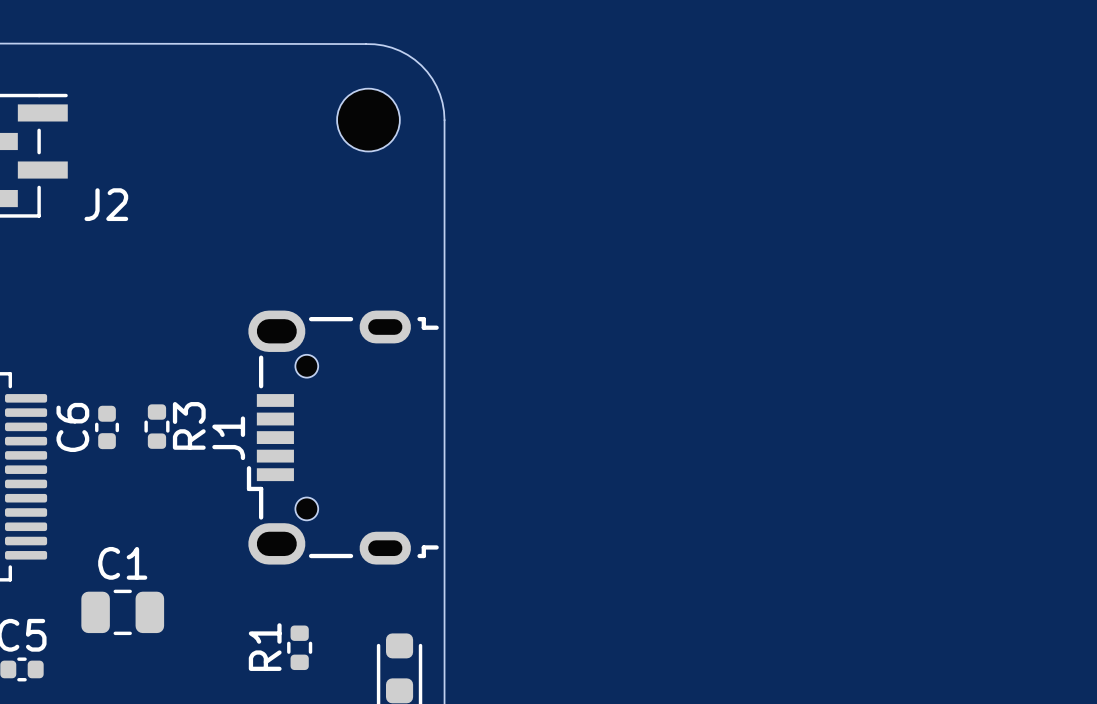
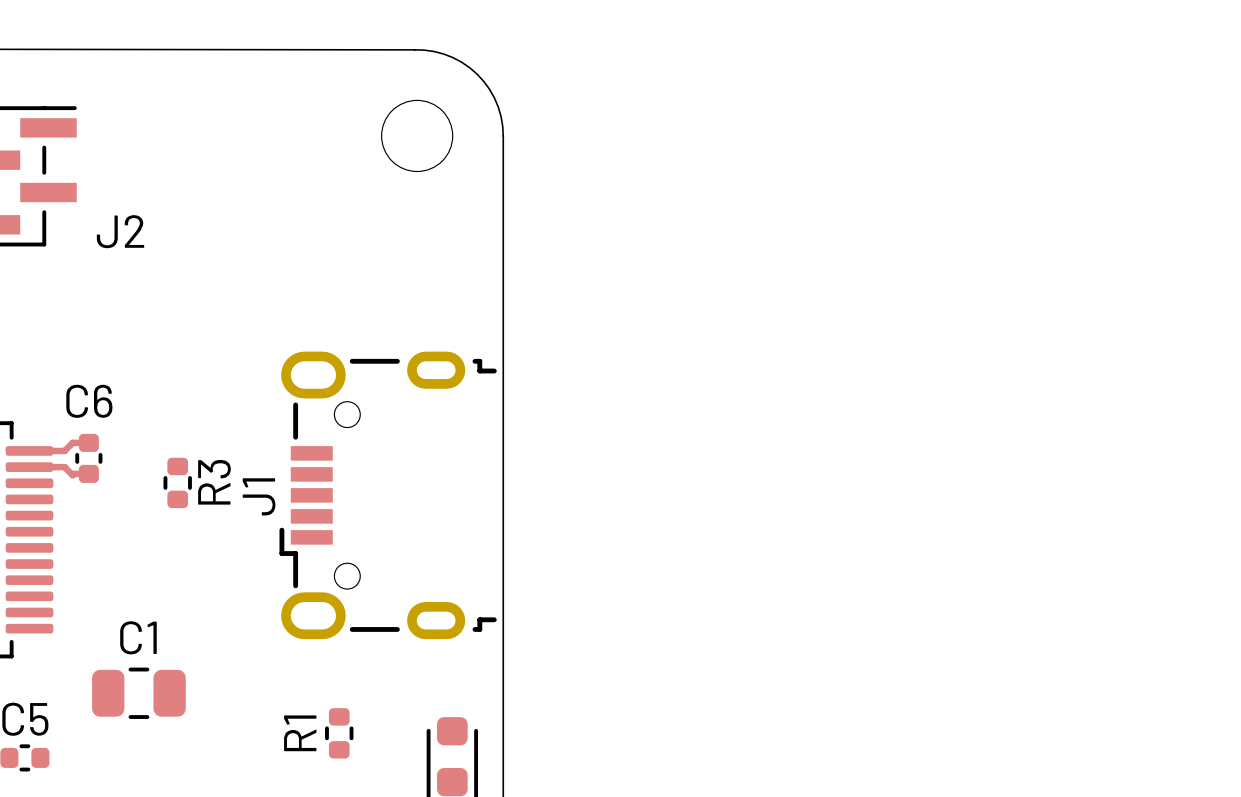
track: none -> (88, 442) (72, 442) (64, 450) (29, 450)
track: none -> (29, 467) (64, 467) (72, 475) (88, 473)
C6 name rotation: 0° (72, 427) -> 90° clockwise (89, 401)
C6 position: (107, 427) -> (88, 458)

